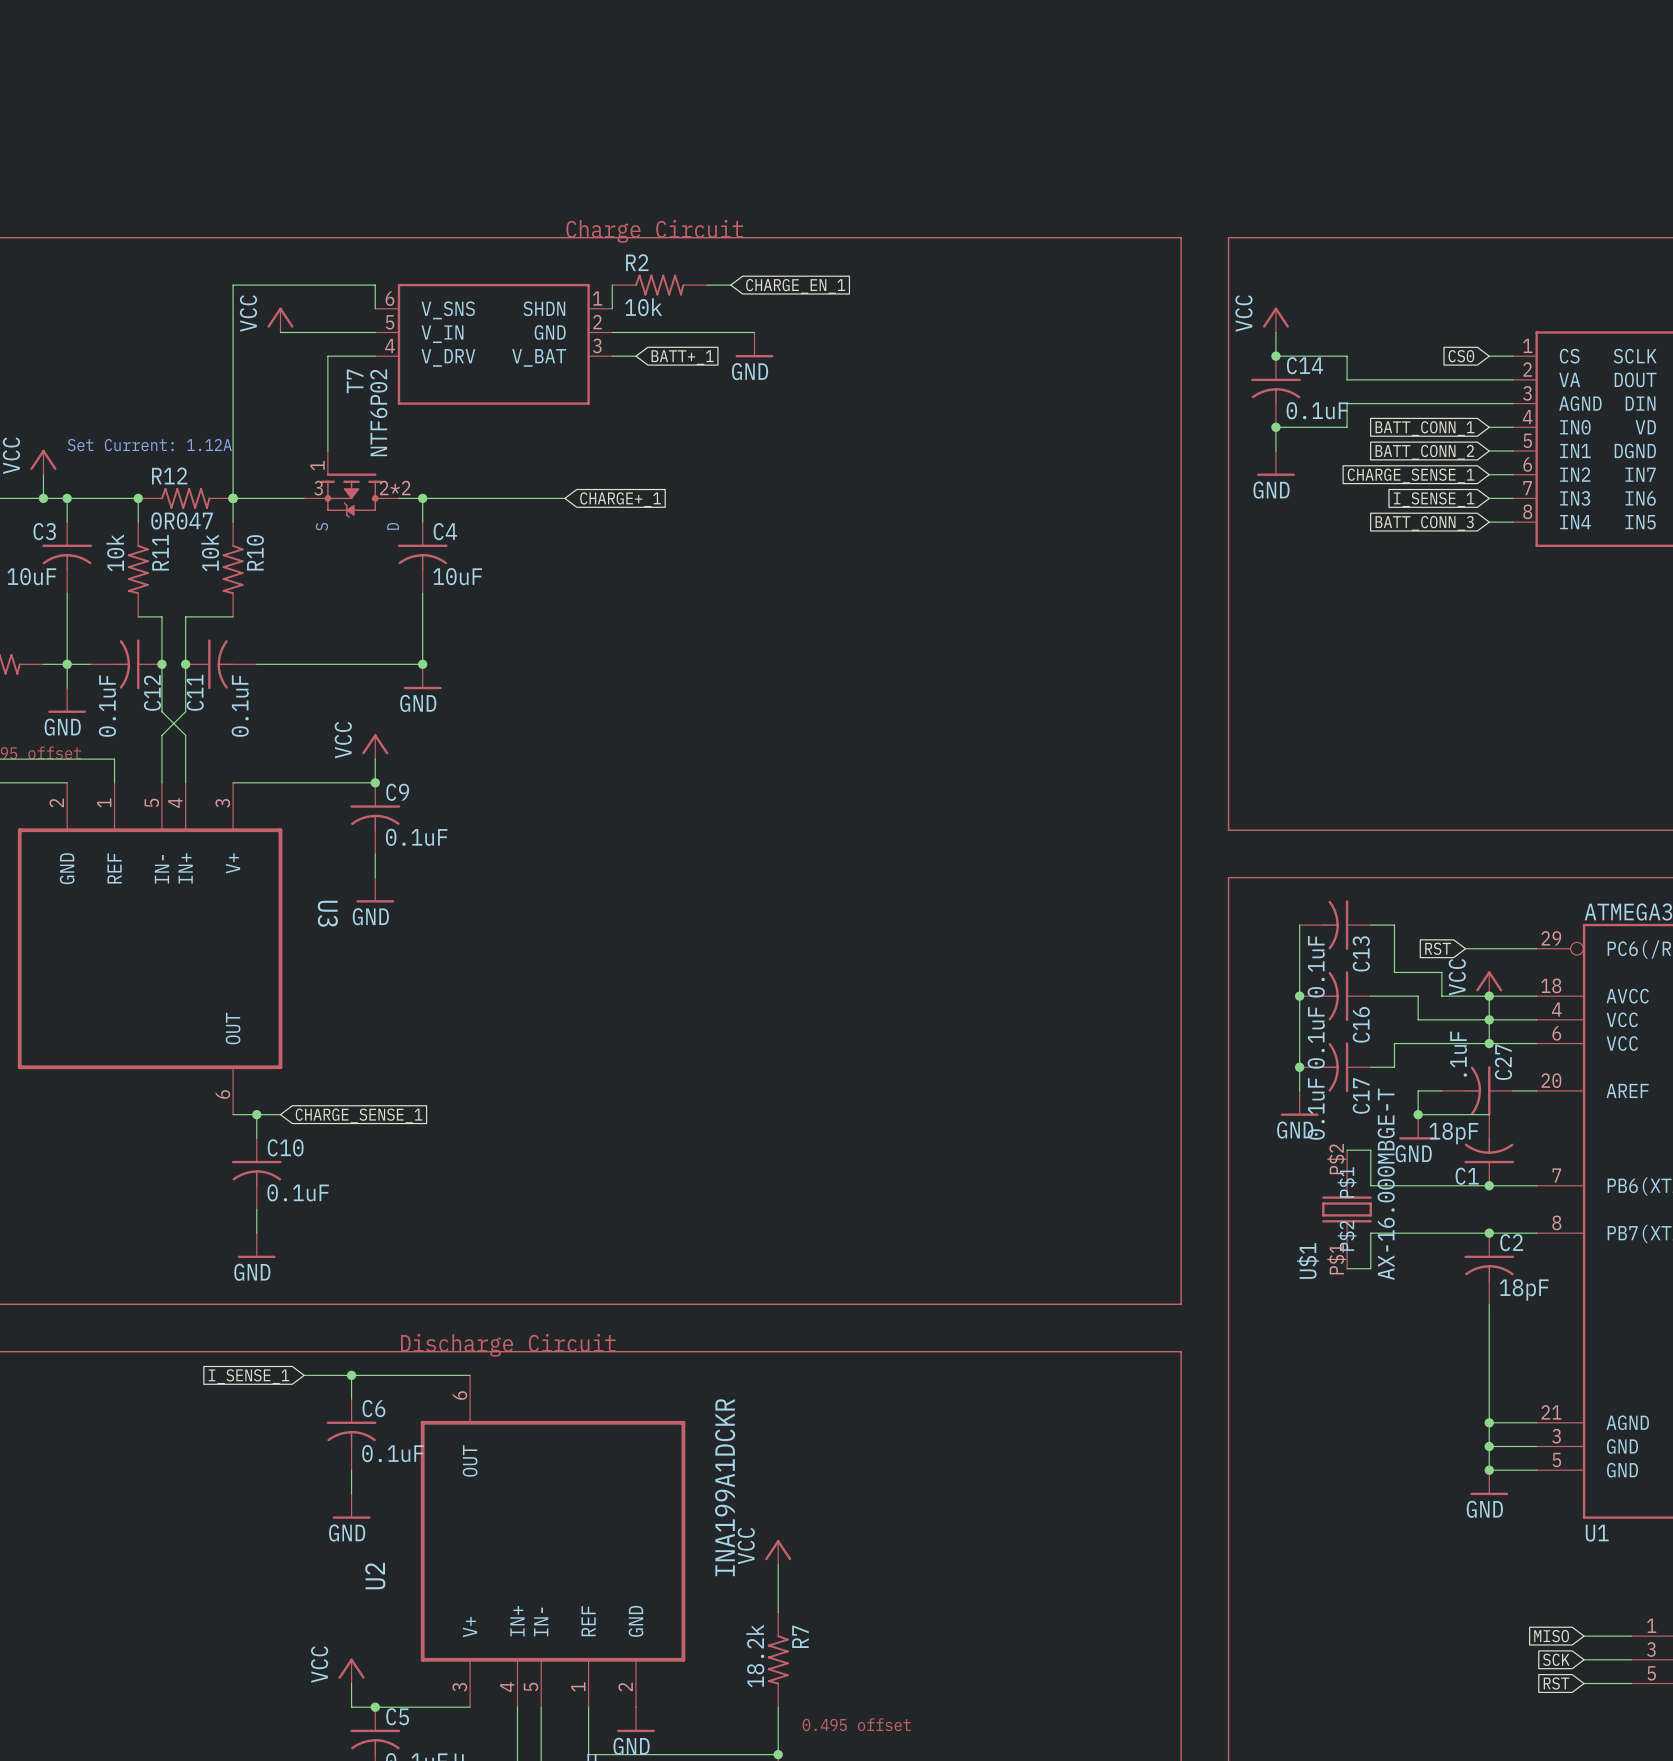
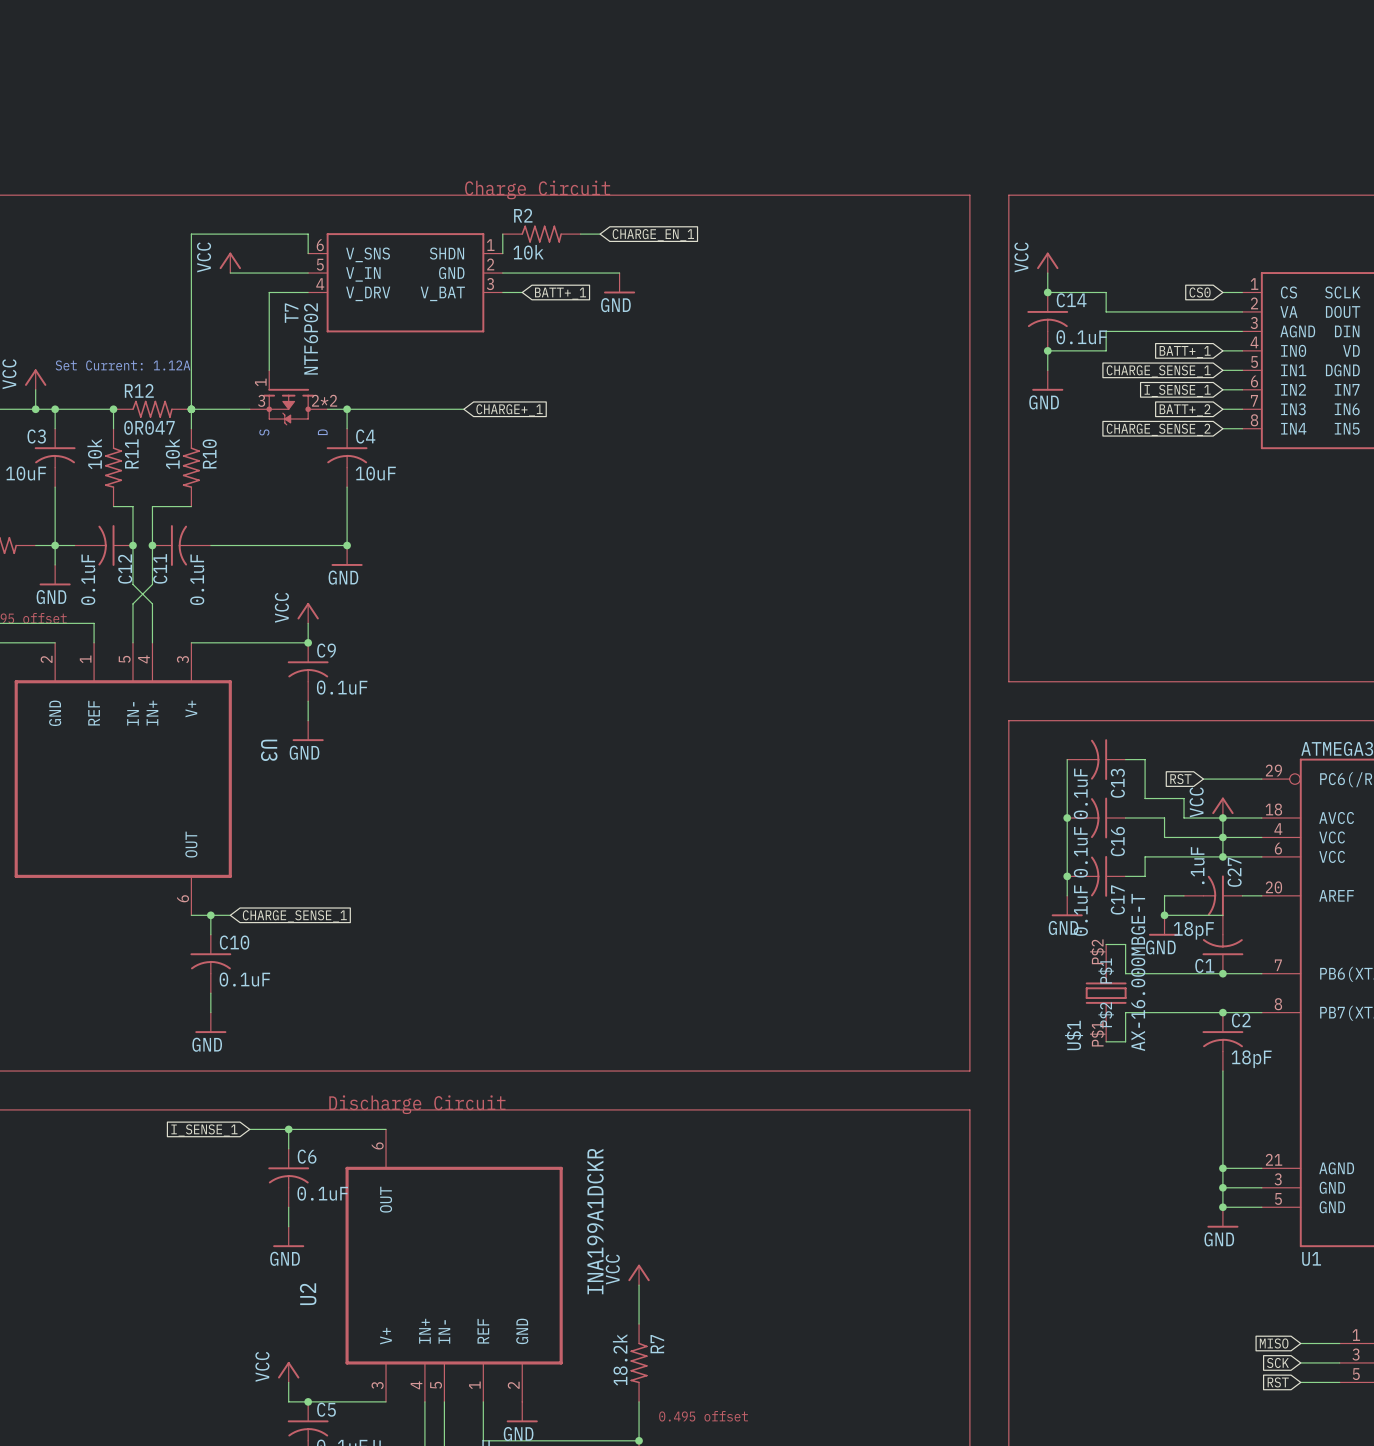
global label: BATT_CONN_1 (1424, 428) -> BATT+_1 (1185, 352)
global label: BATT_CONN_2 (1424, 452) -> CHARGE_SENSE_1 (1158, 371)
global label: CHARGE_SENSE_1 (1411, 476) -> I_SENSE_1 (1177, 390)
global label: I_SENSE_1 (1434, 499) -> BATT+_2 (1185, 410)
global label: BATT_CONN_3 (1424, 523) -> CHARGE_SENSE_2 (1158, 429)

